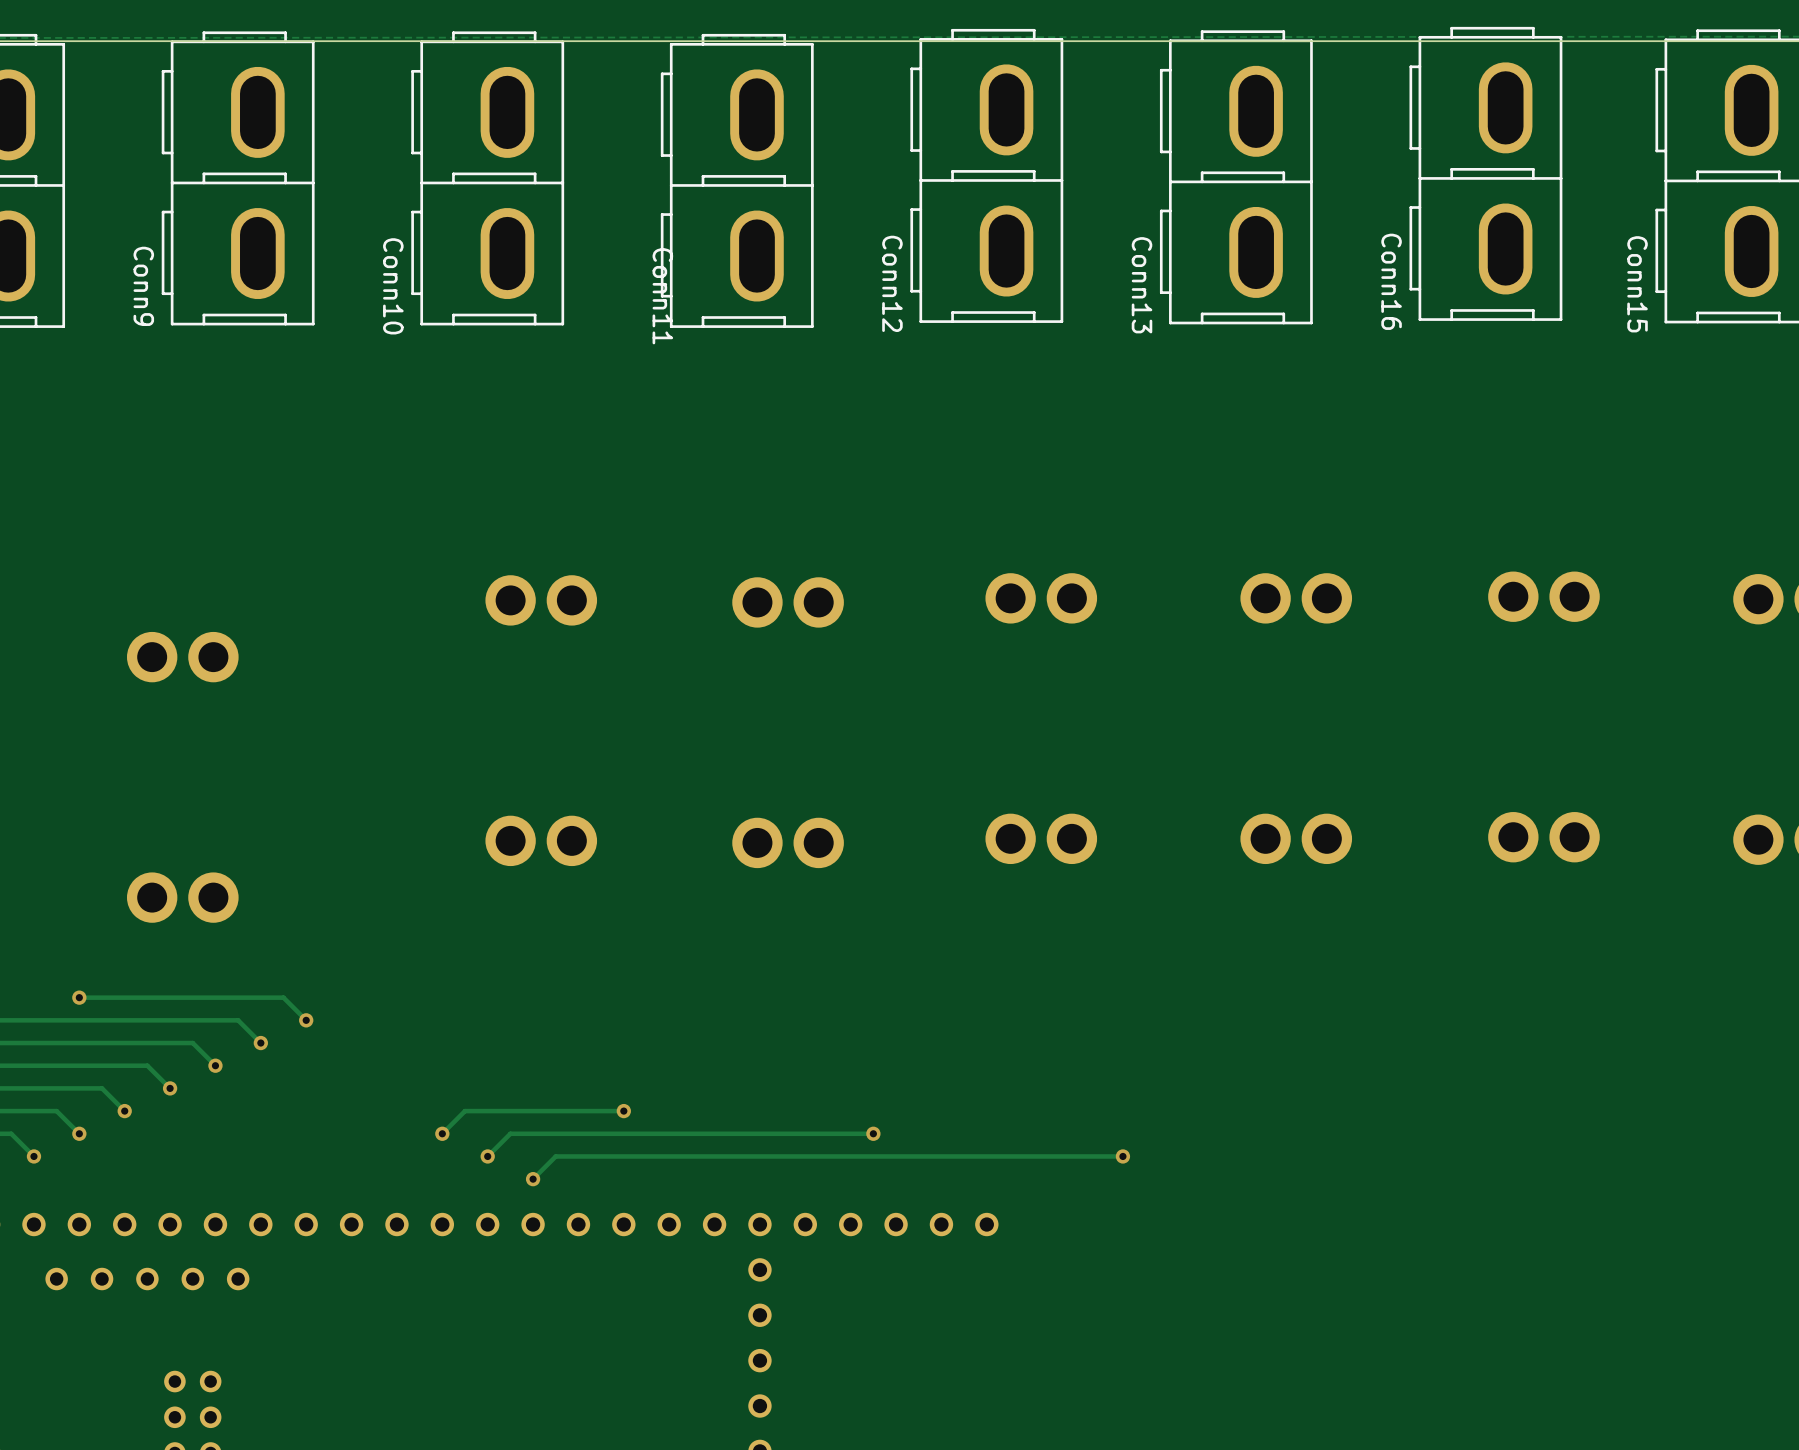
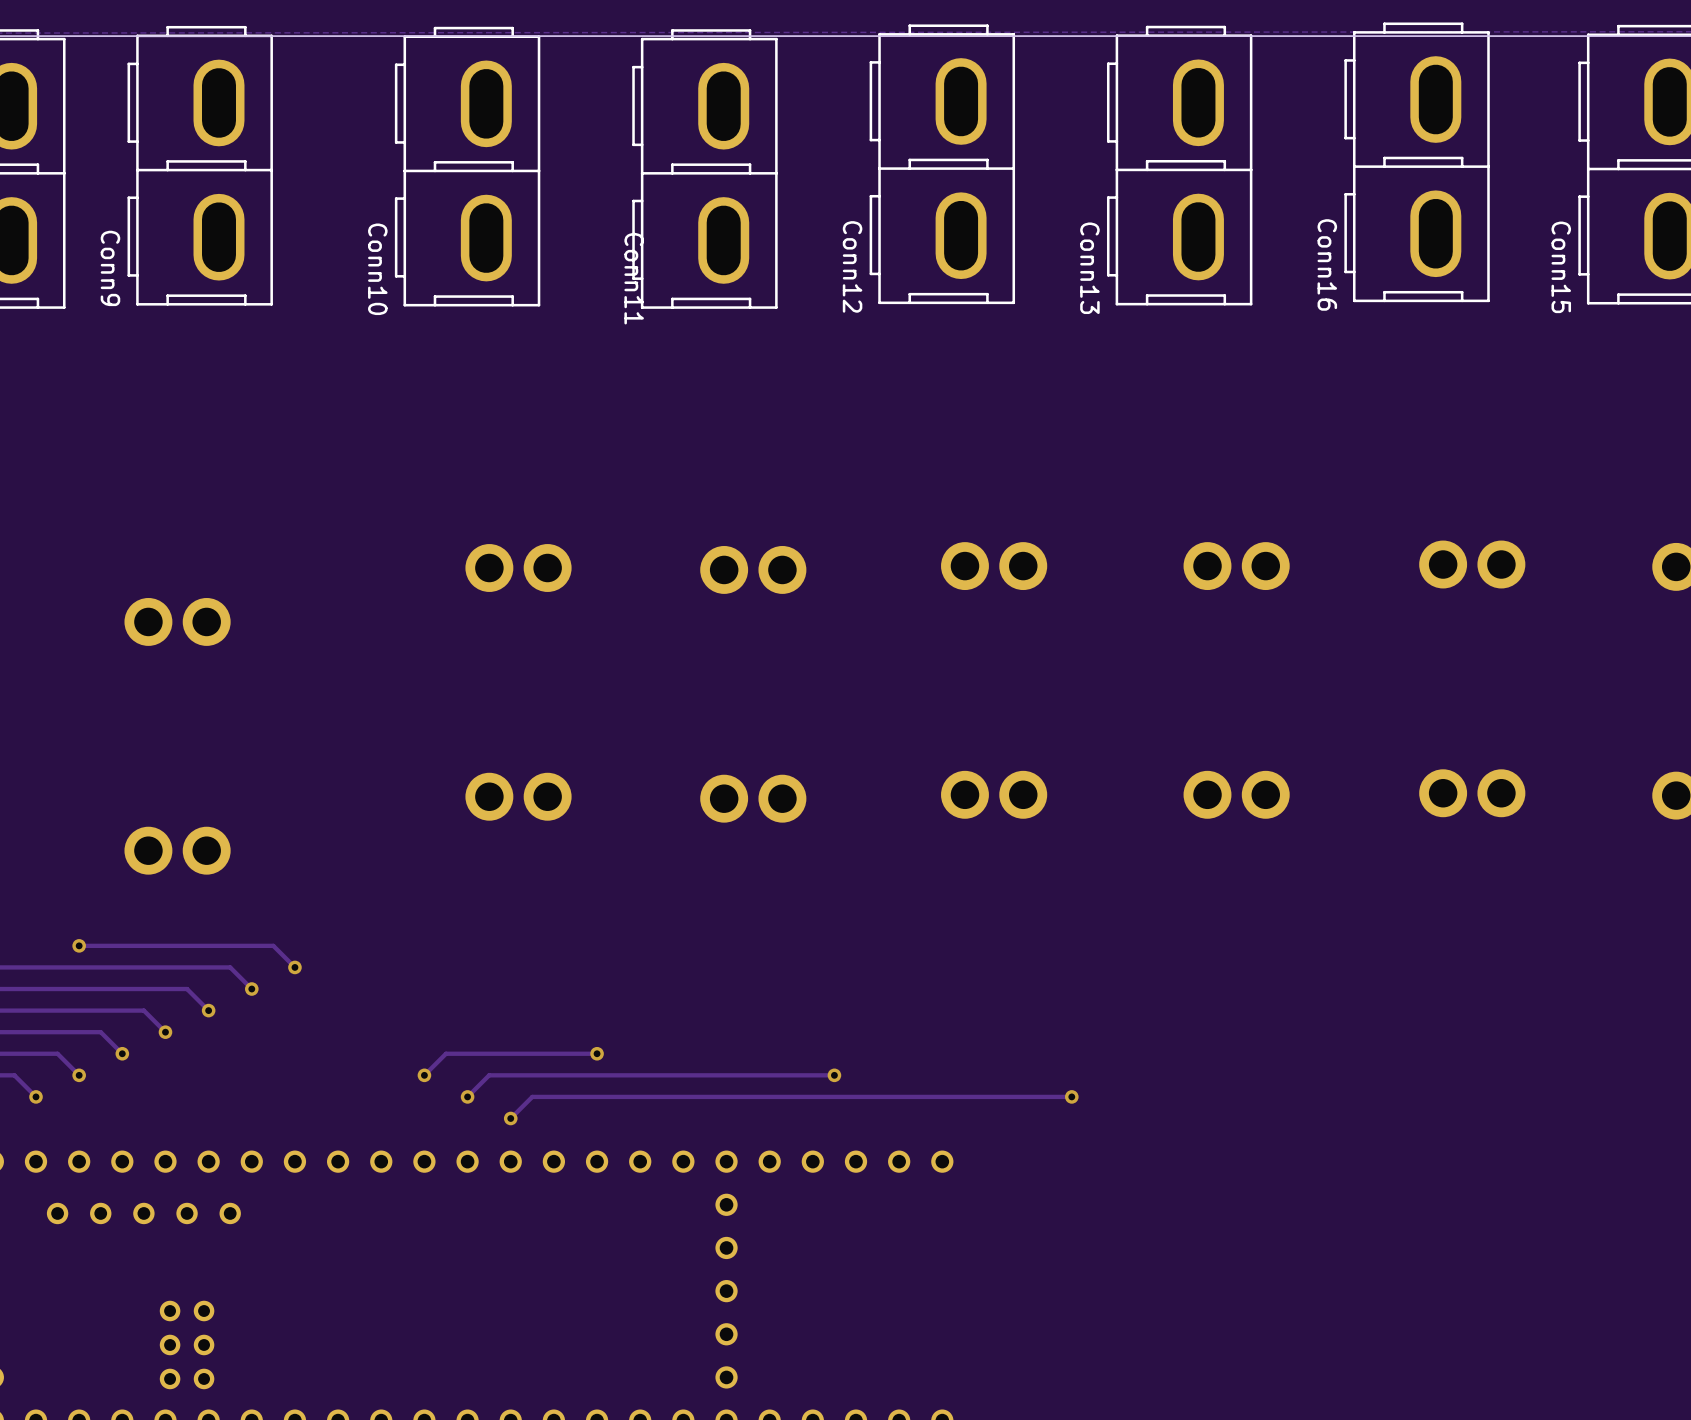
Conn9 position: (238, 178) -> (200, 165)

